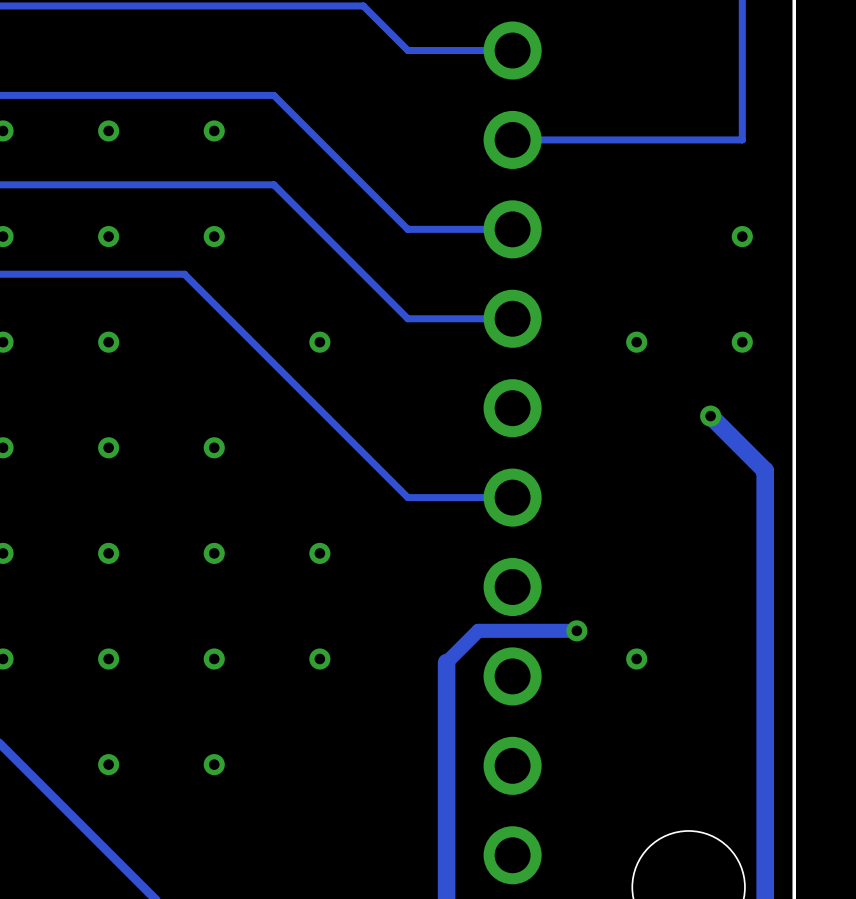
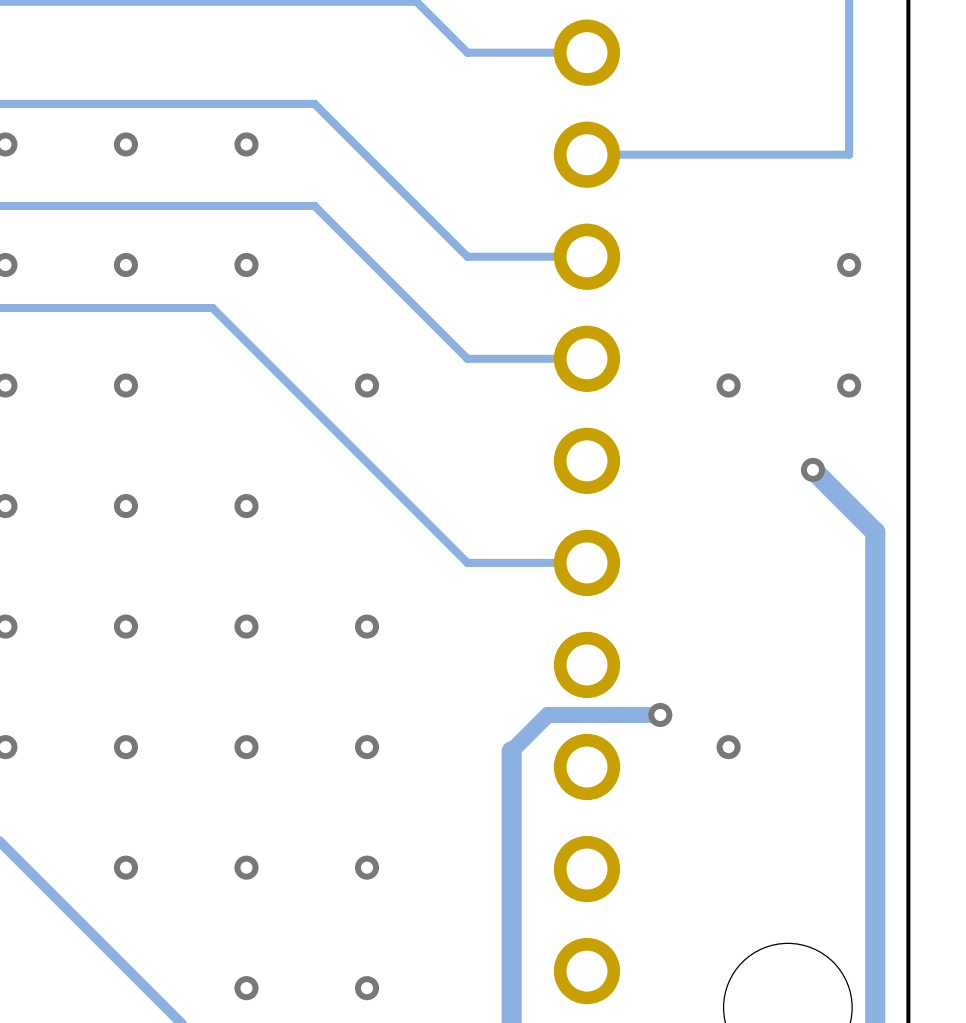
via: none -> (367, 867)
via: none -> (246, 988)
via: none -> (367, 988)

